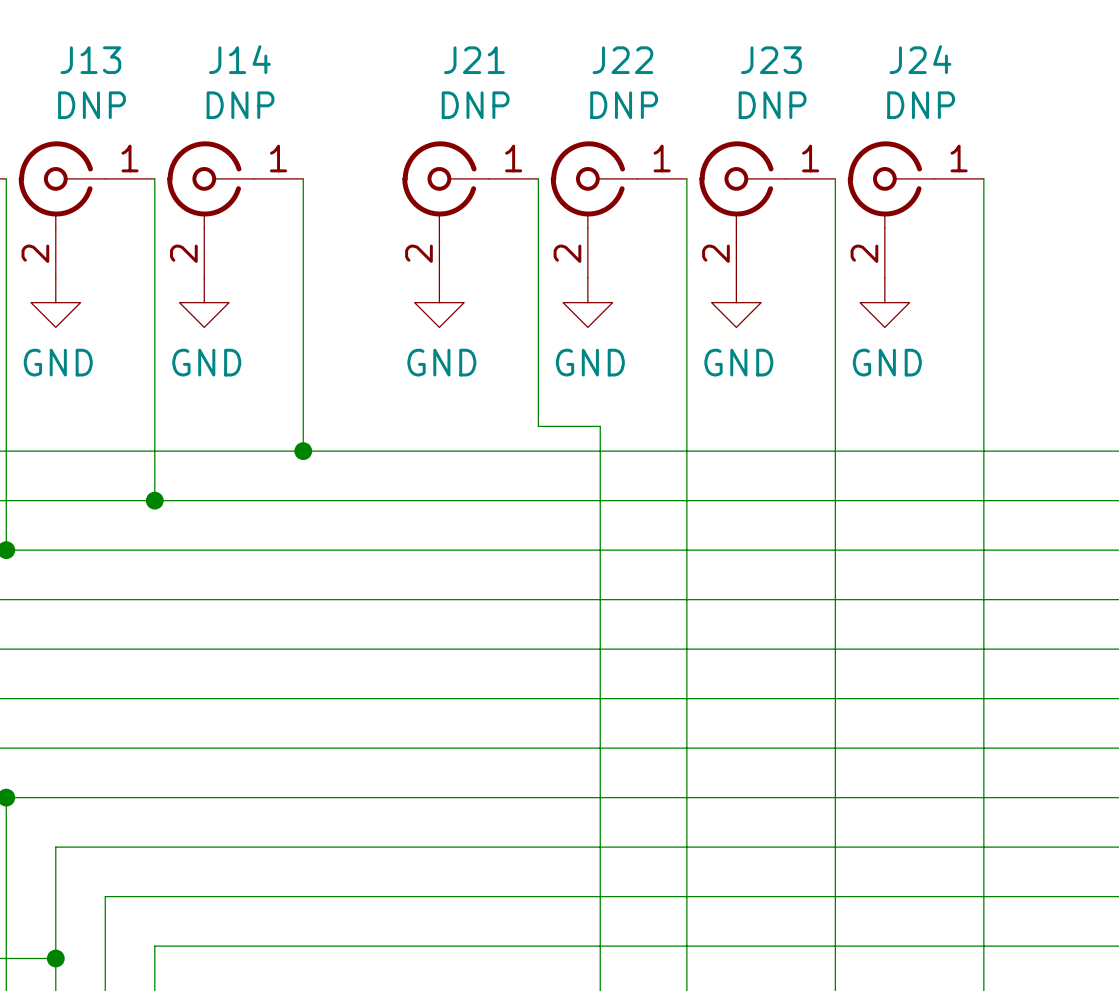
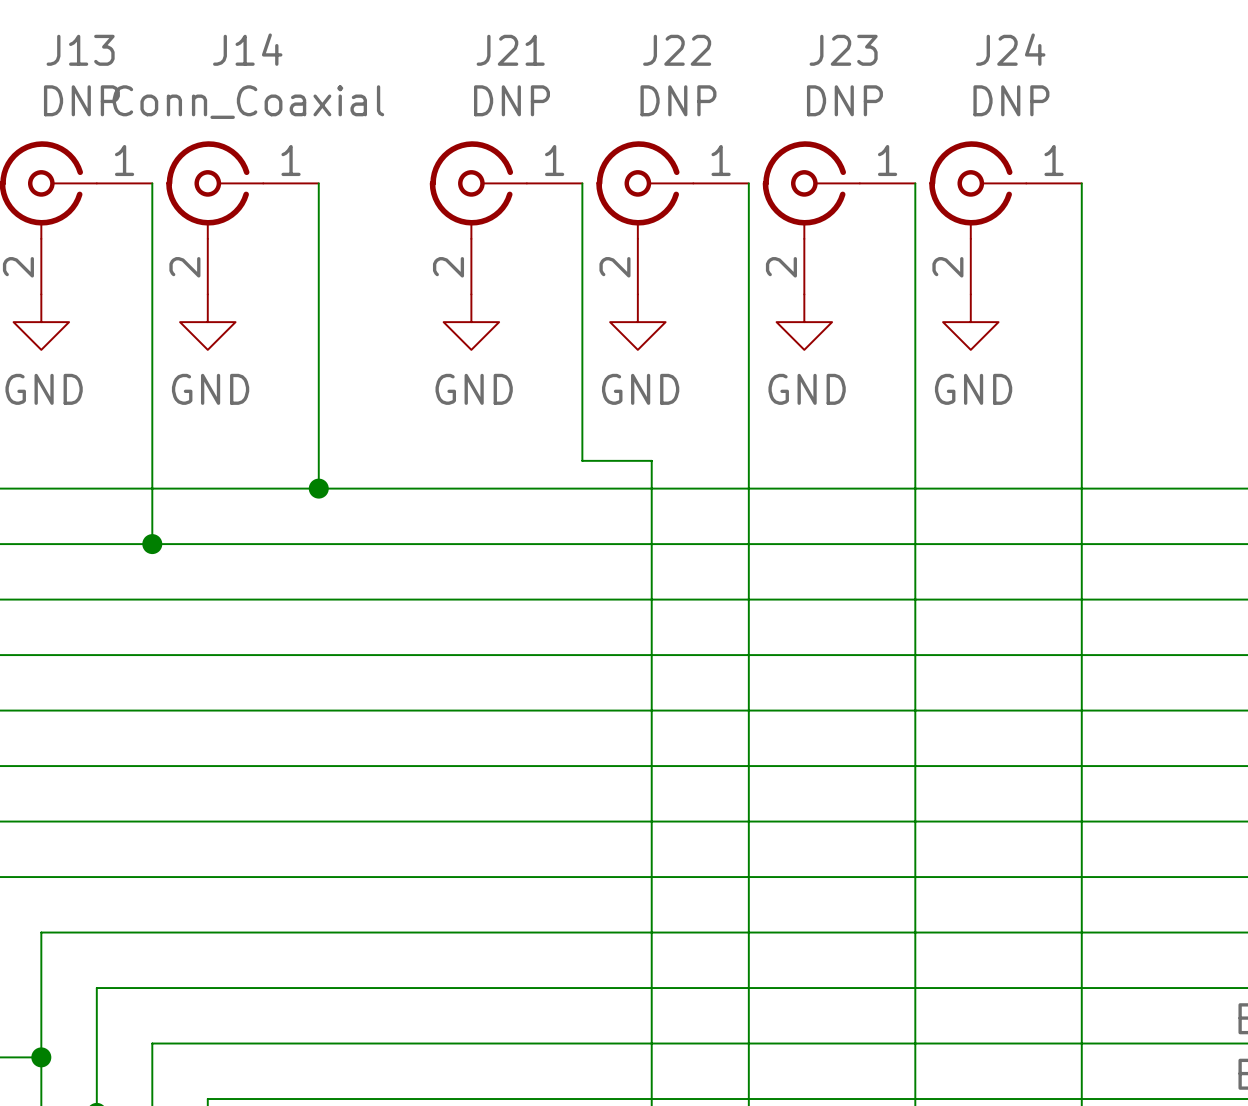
J14 value: DNP (240, 105) -> Conn_Coaxial (248, 102)

